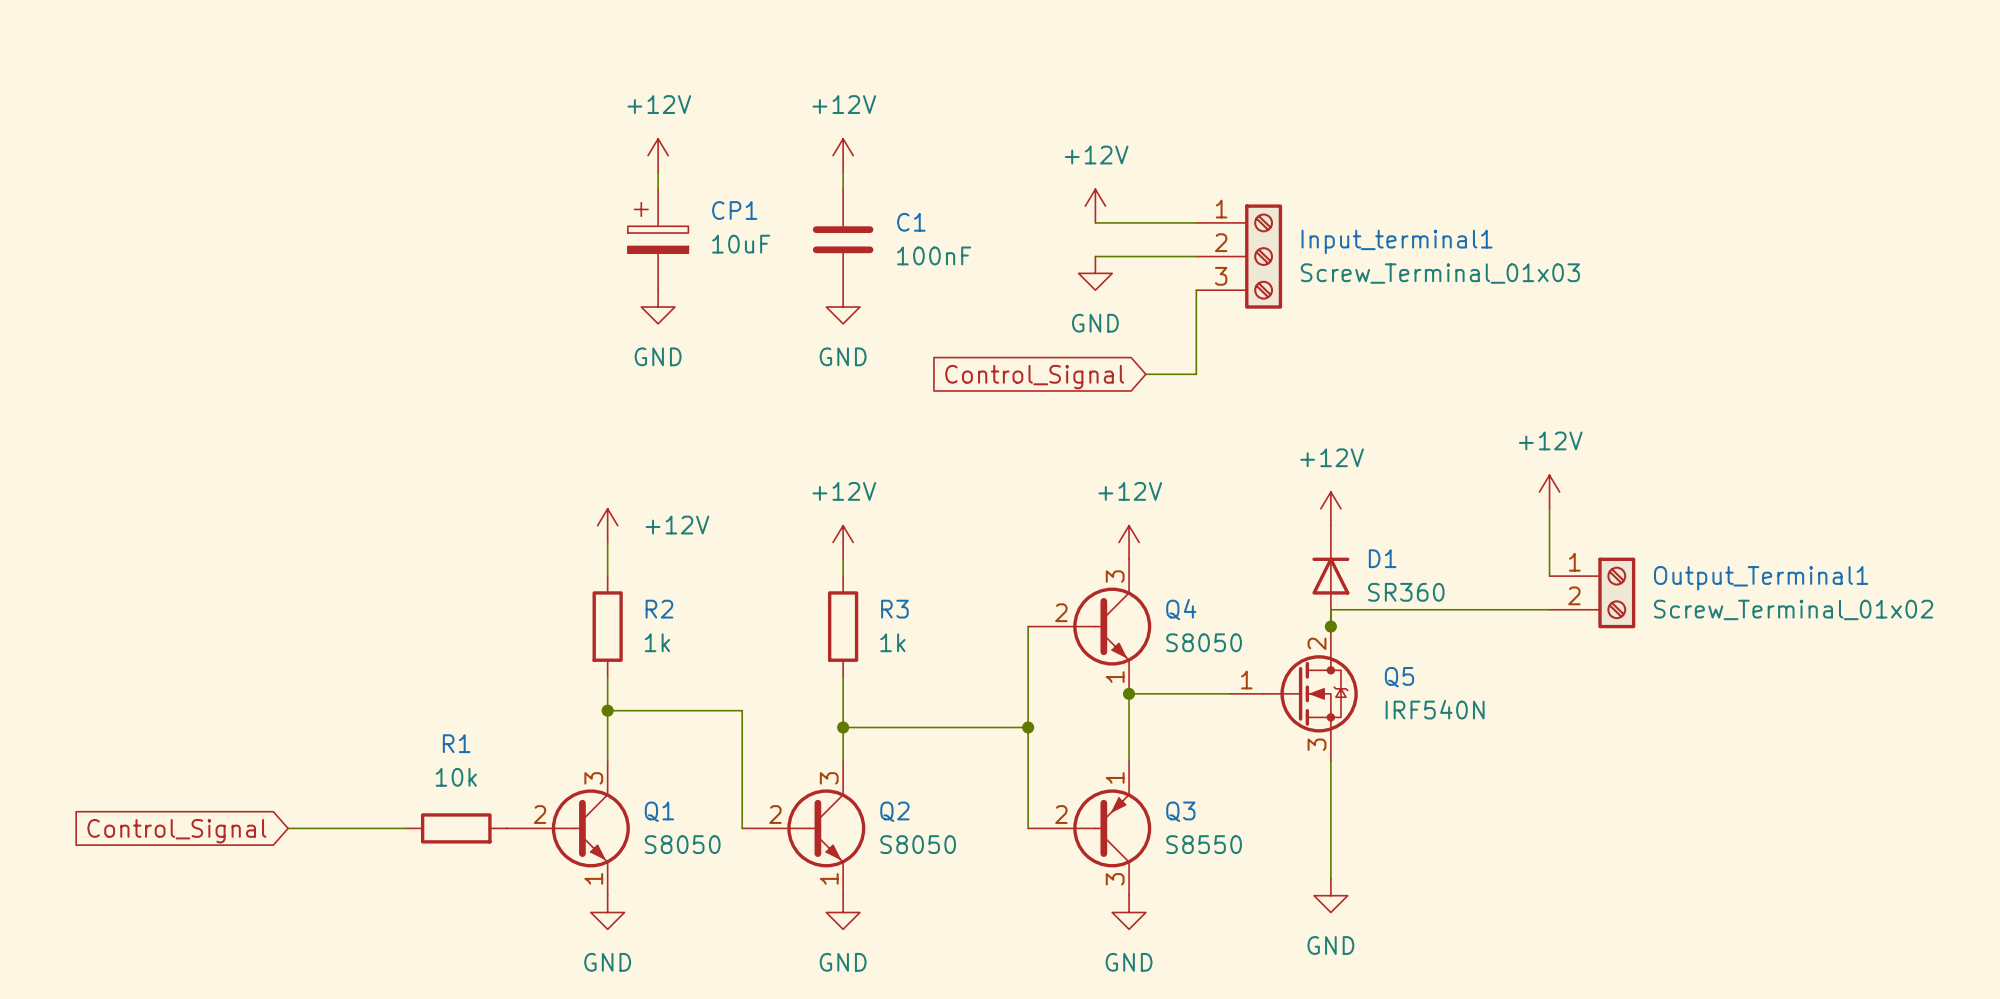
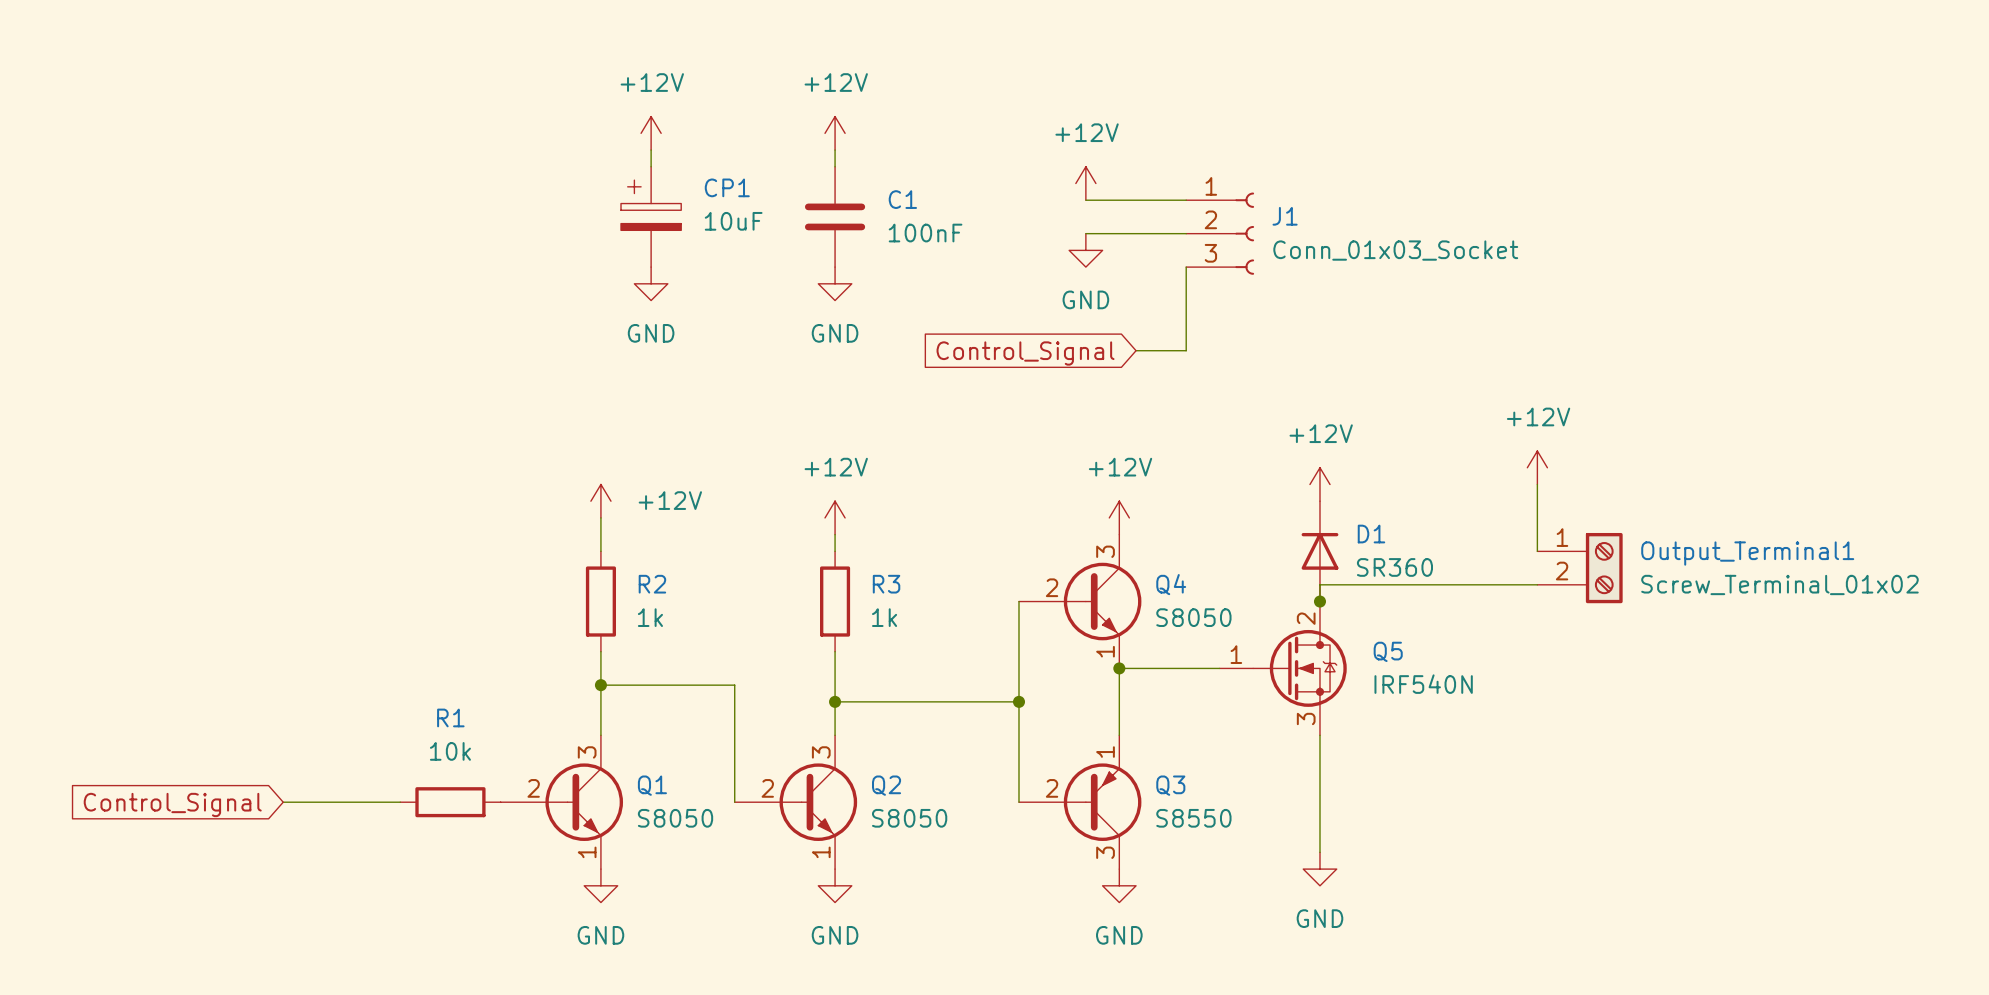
J1: none -> Conn_01x03_Socket (1220, 233)
Input_terminal1: Screw_Terminal_01x03 (1239, 256) -> none

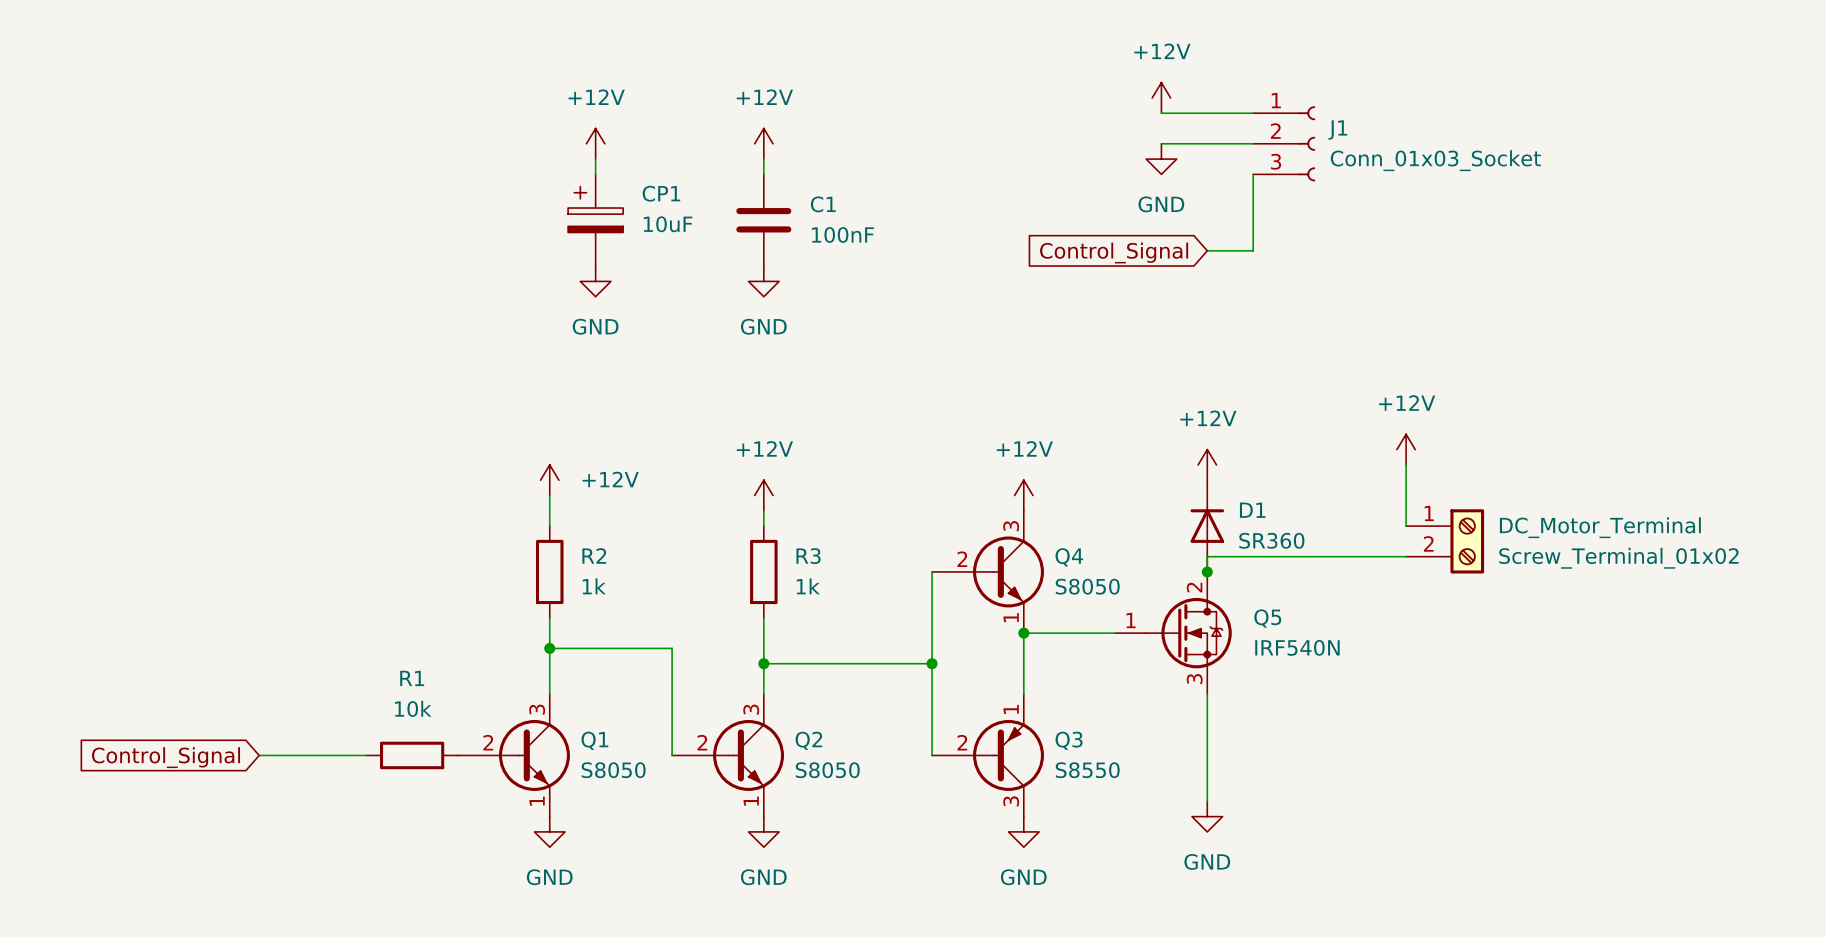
power symbol position: +12V (1085, 183) -> +12V (1161, 97)
wire: (1085, 200) (1186, 200) -> (1161, 143) (1253, 143)
wire: (1085, 233) (1186, 233) -> (1161, 113) (1253, 113)
J1 position: (1220, 233) -> (1284, 143)
power symbol position: GND (1085, 250) -> GND (1161, 159)
wire: (1186, 267) (1186, 350) (1136, 350) -> (1253, 174) (1253, 250) (1207, 250)
global label position: Control_Signal (1025, 353) -> Control_Signal (1114, 252)
Output_Terminal1 name: Output_Terminal1 (1747, 553) -> DC_Motor_Terminal (1600, 527)

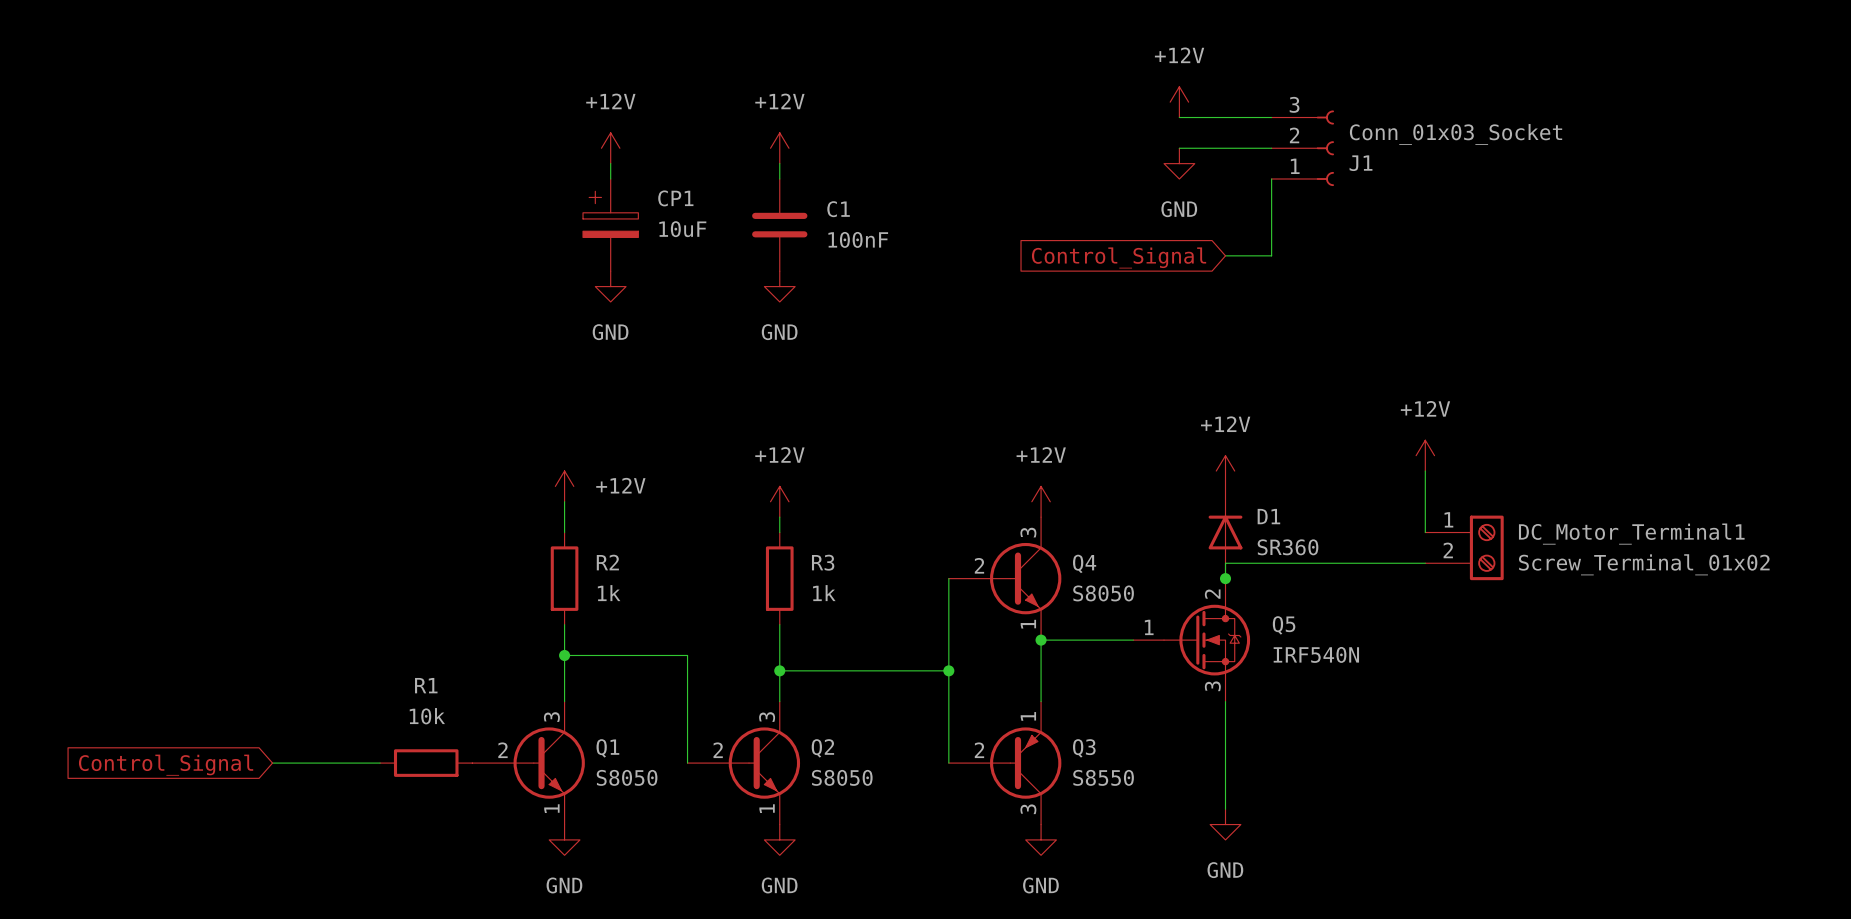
J1 flip: as is (1306, 143) -> up-down (1325, 148)
DC_Motor_Terminal name: DC_Motor_Terminal (1600, 527) -> DC_Motor_Terminal1 (1631, 534)

